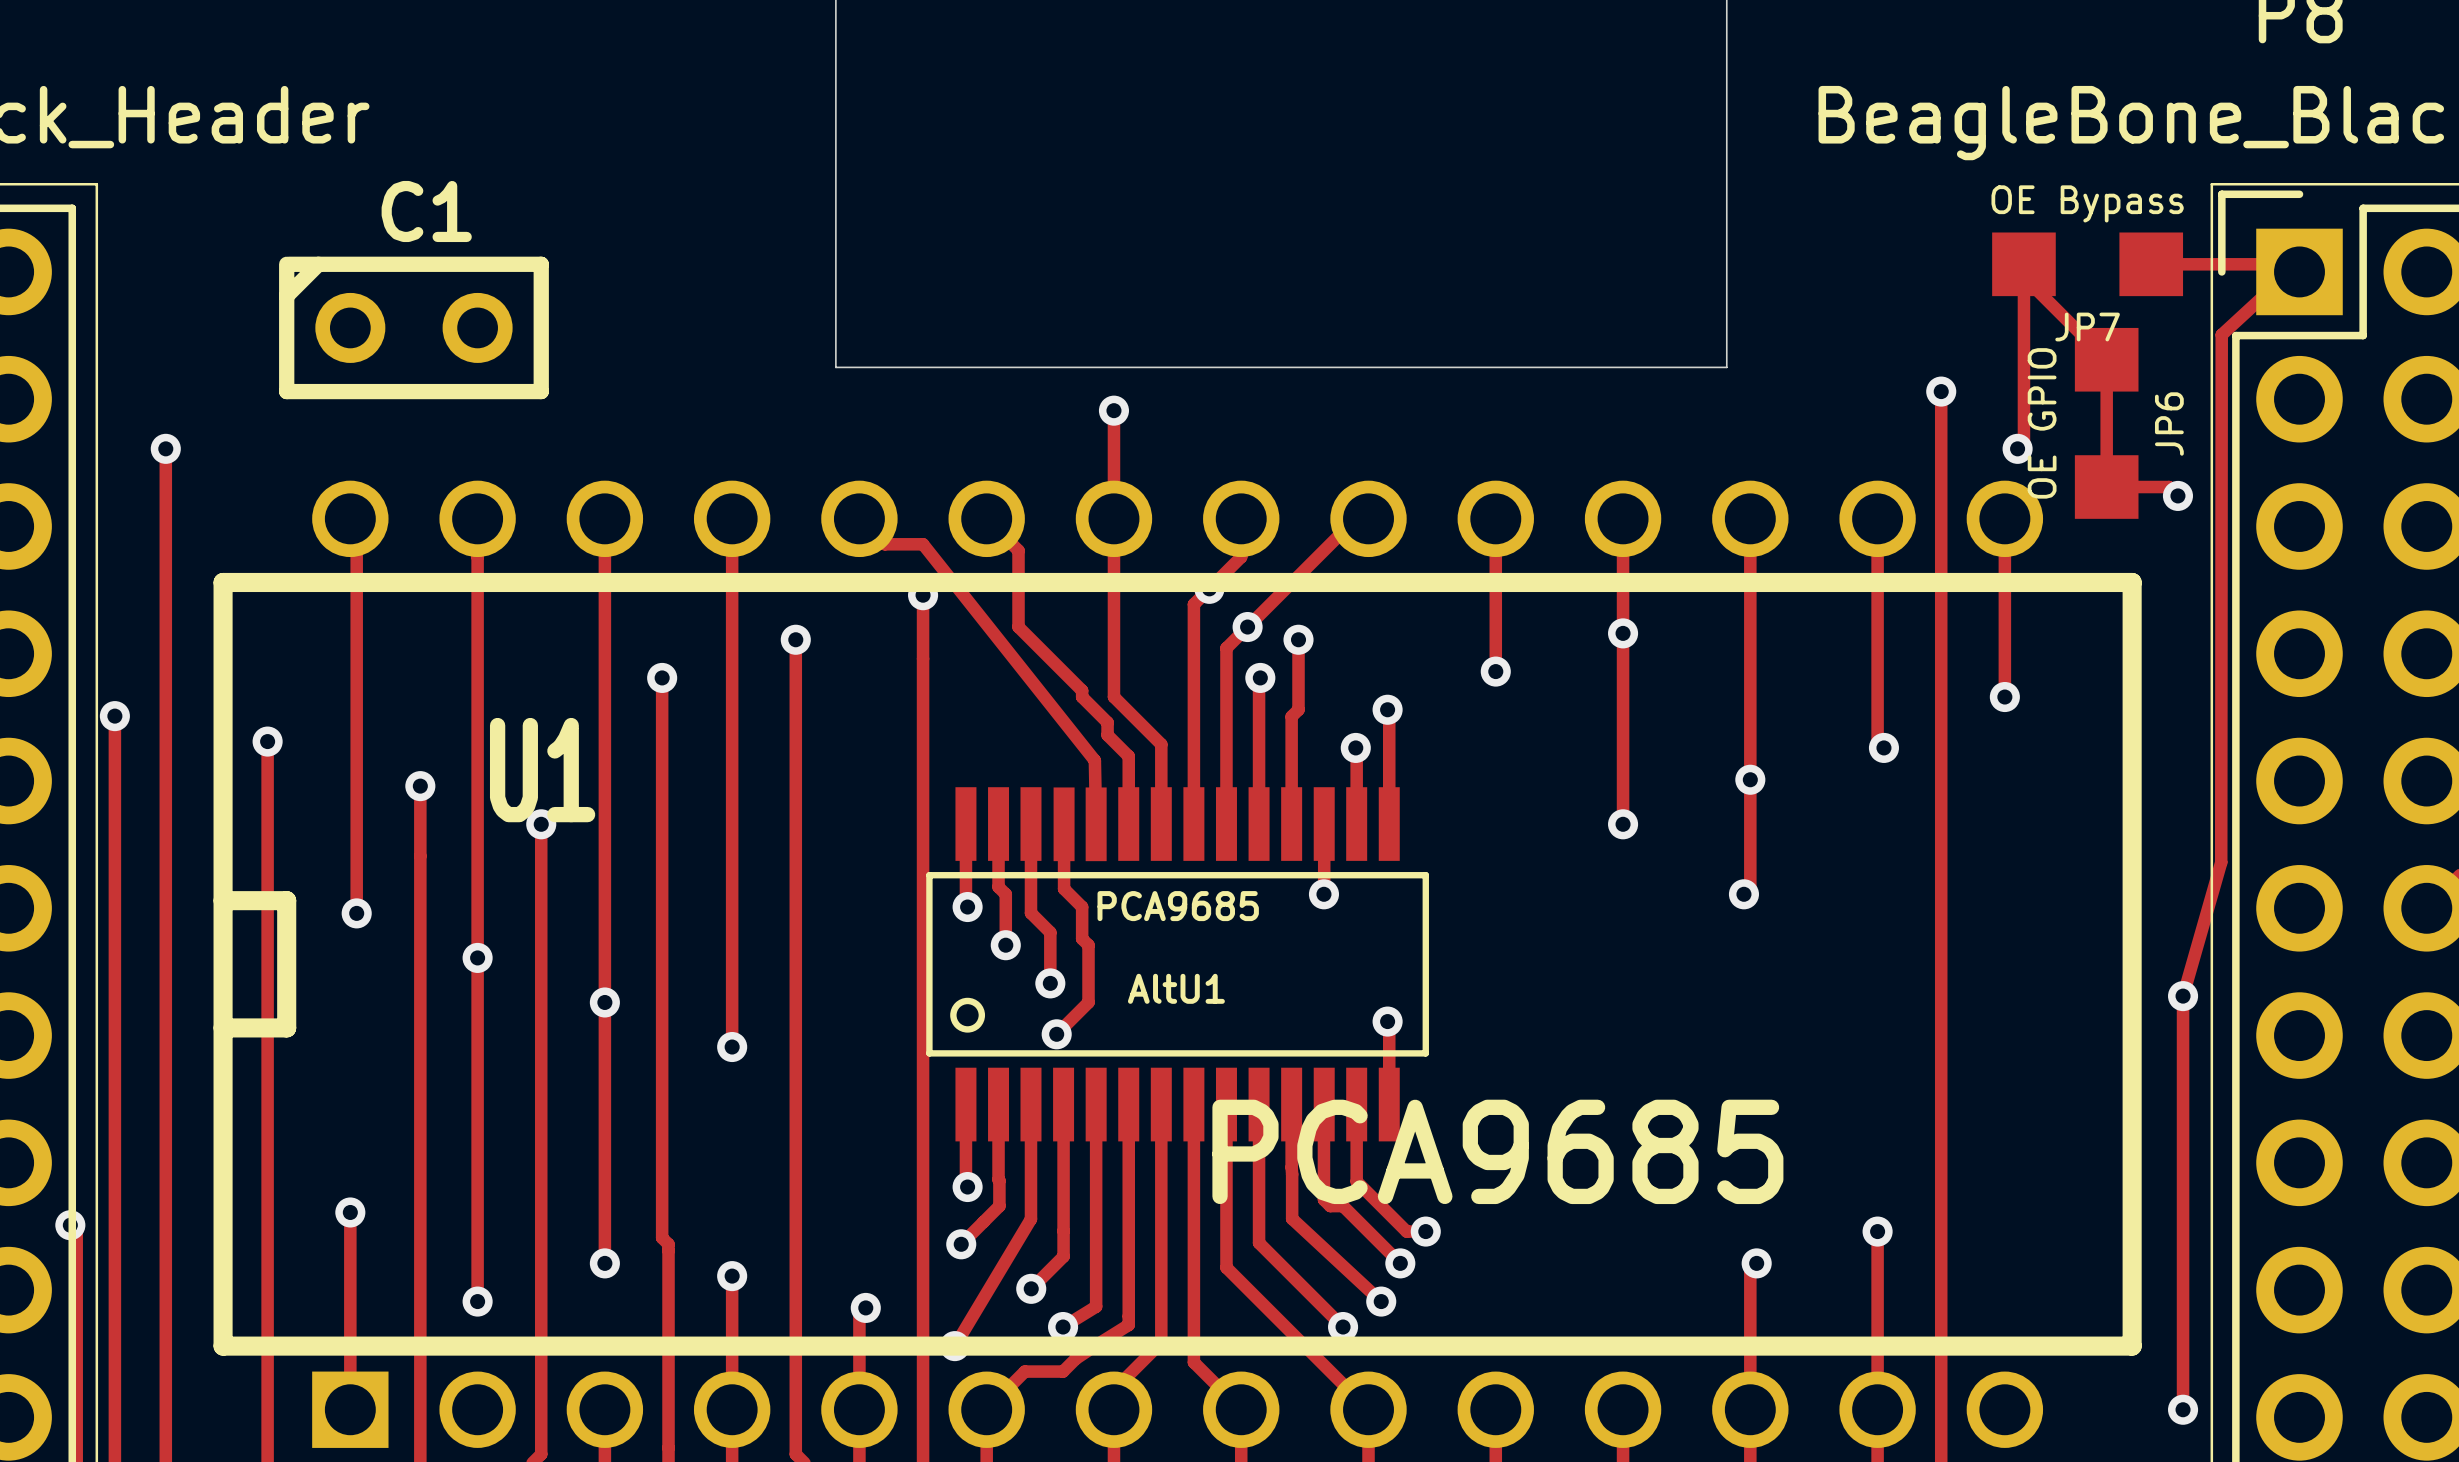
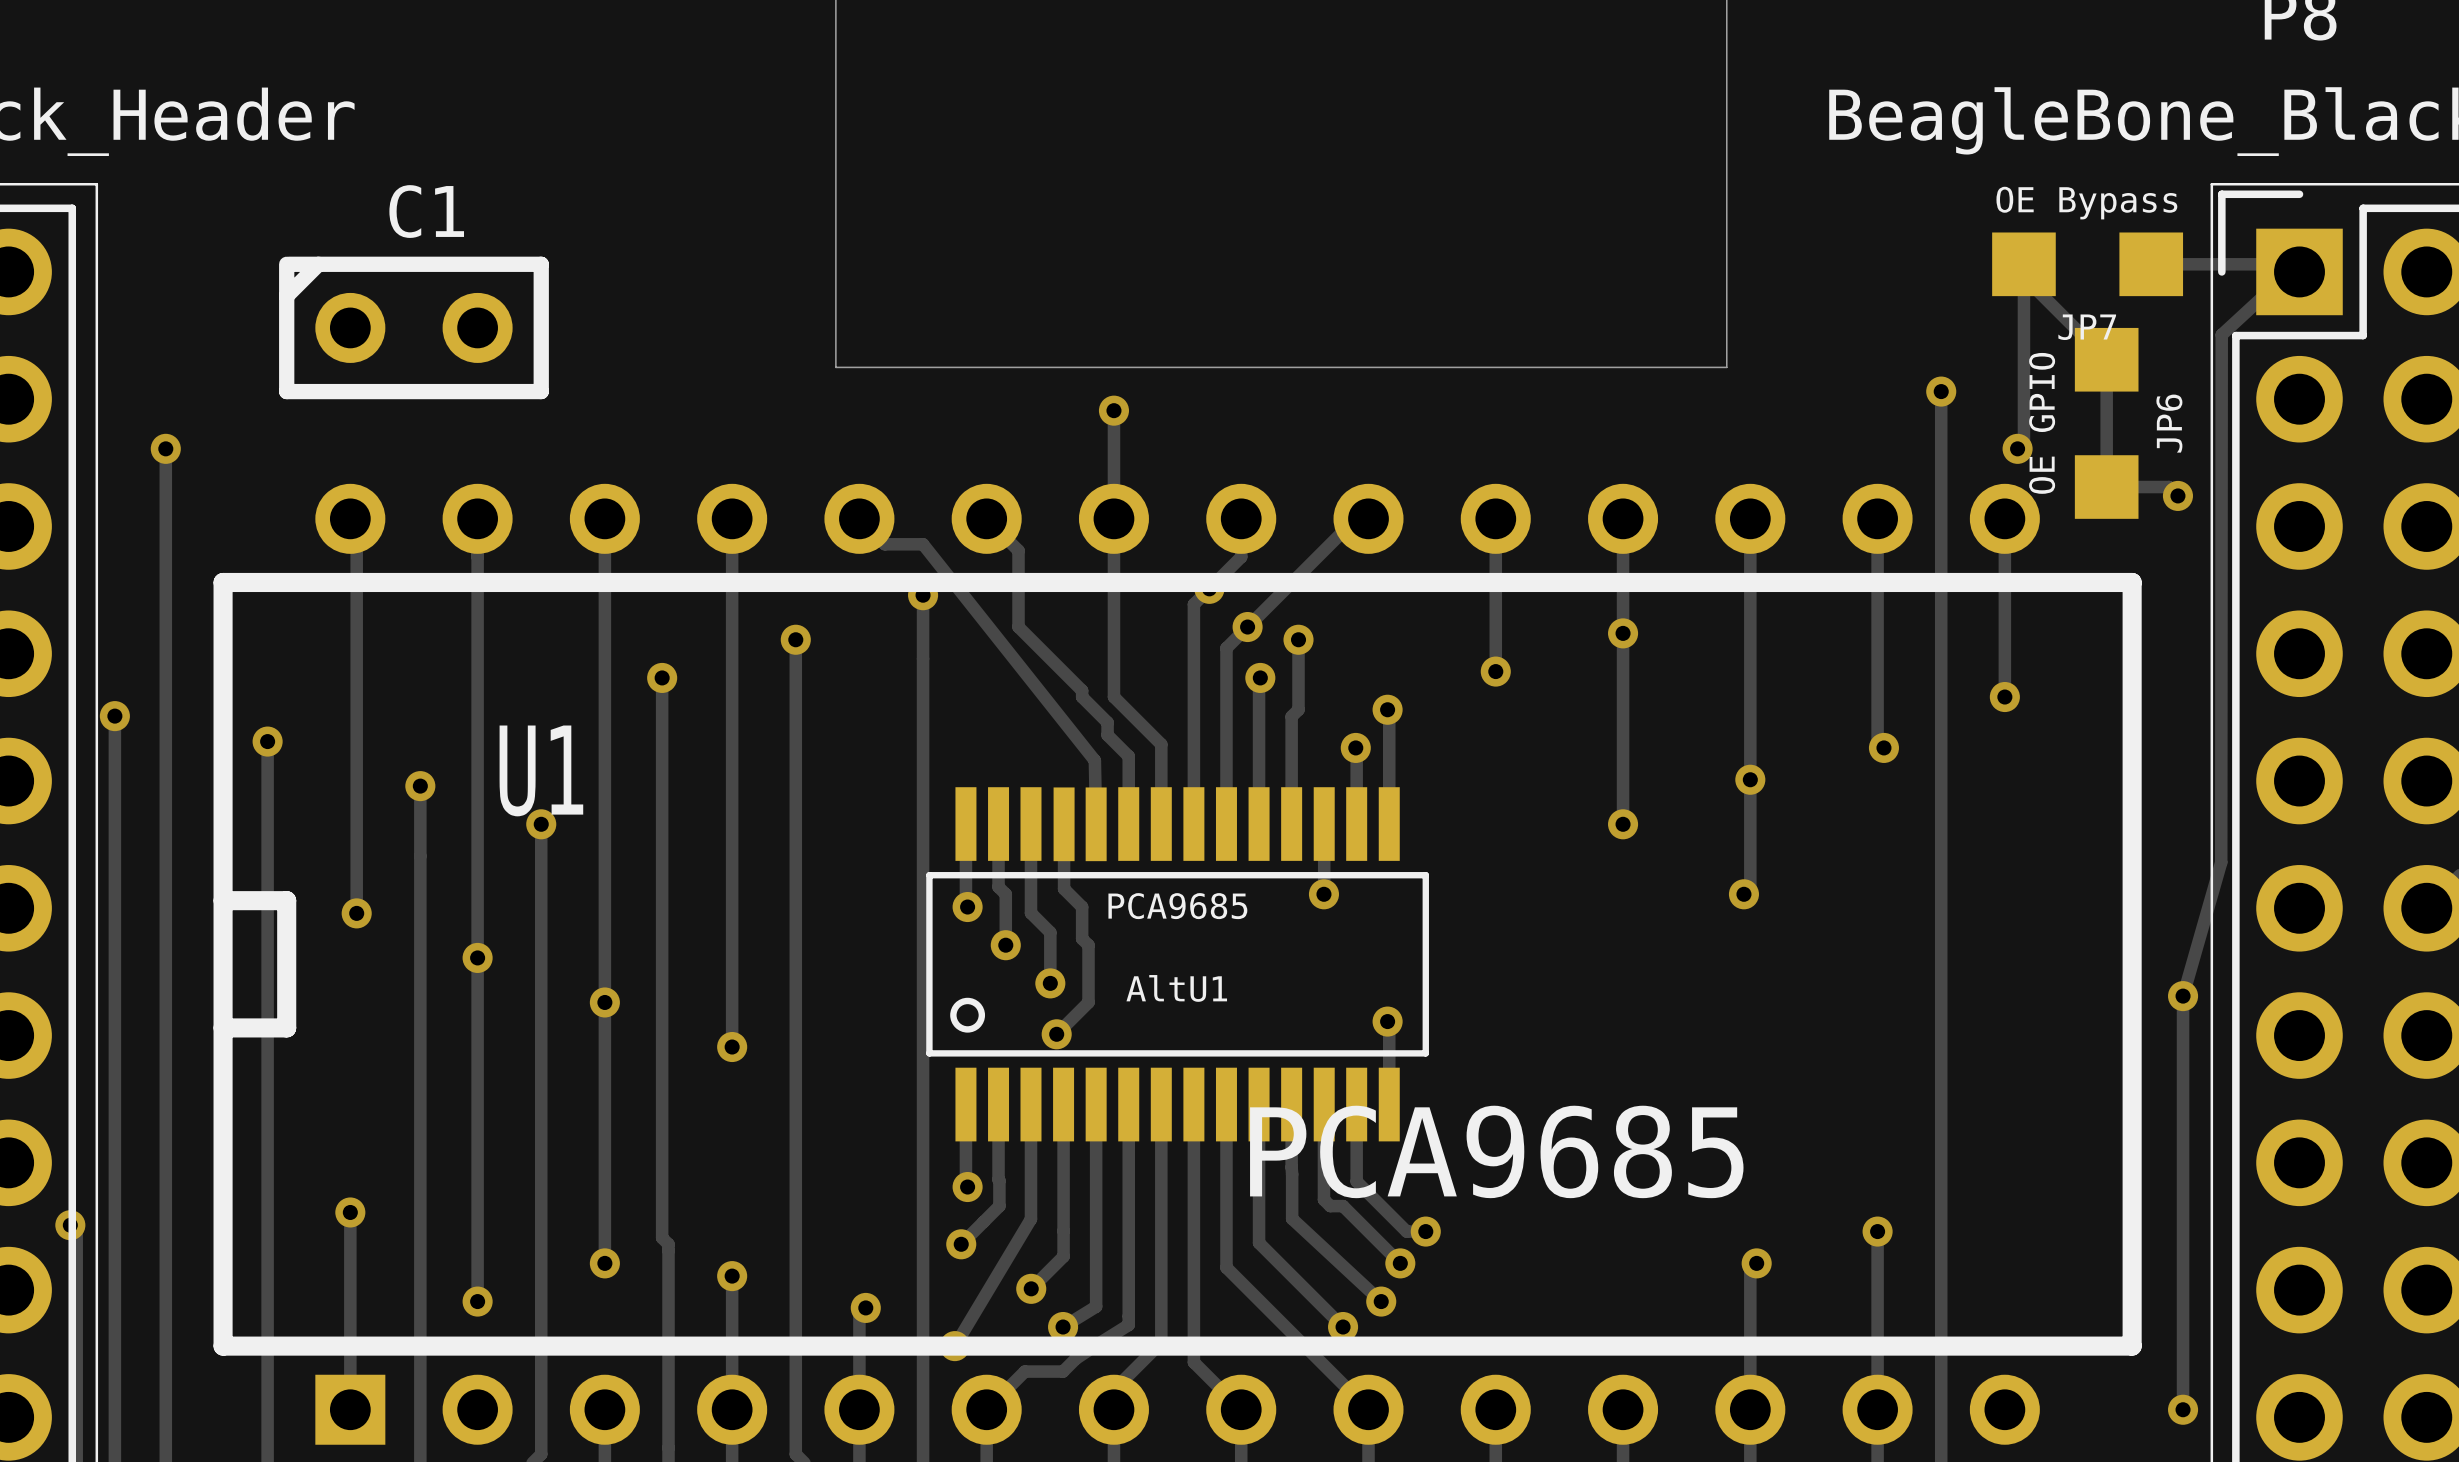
U1 footprint: [213, 480, 2142, 1448] -> [213, 483, 2142, 1445]

